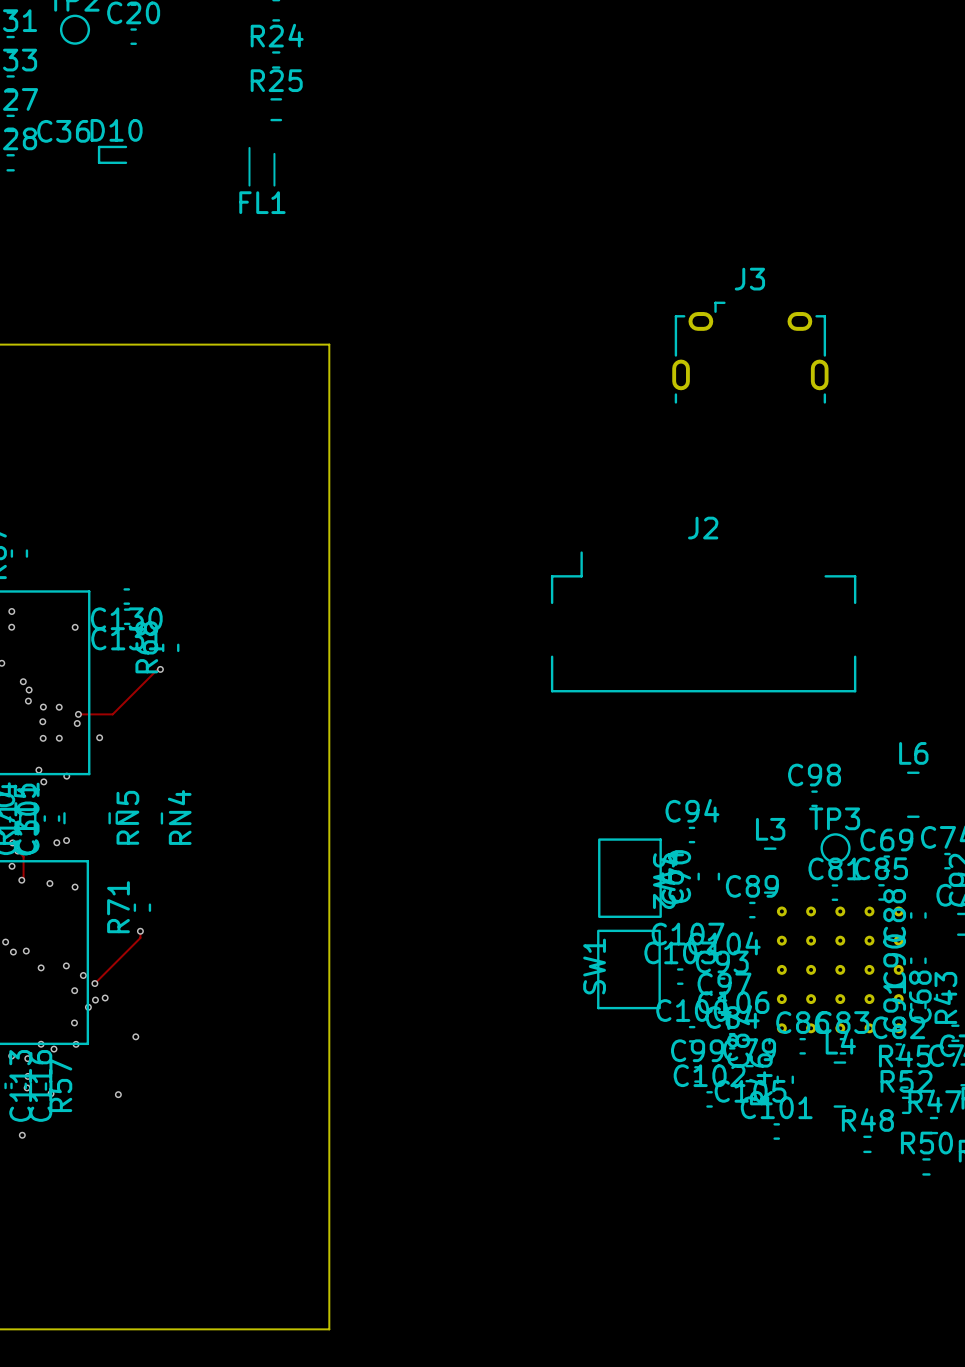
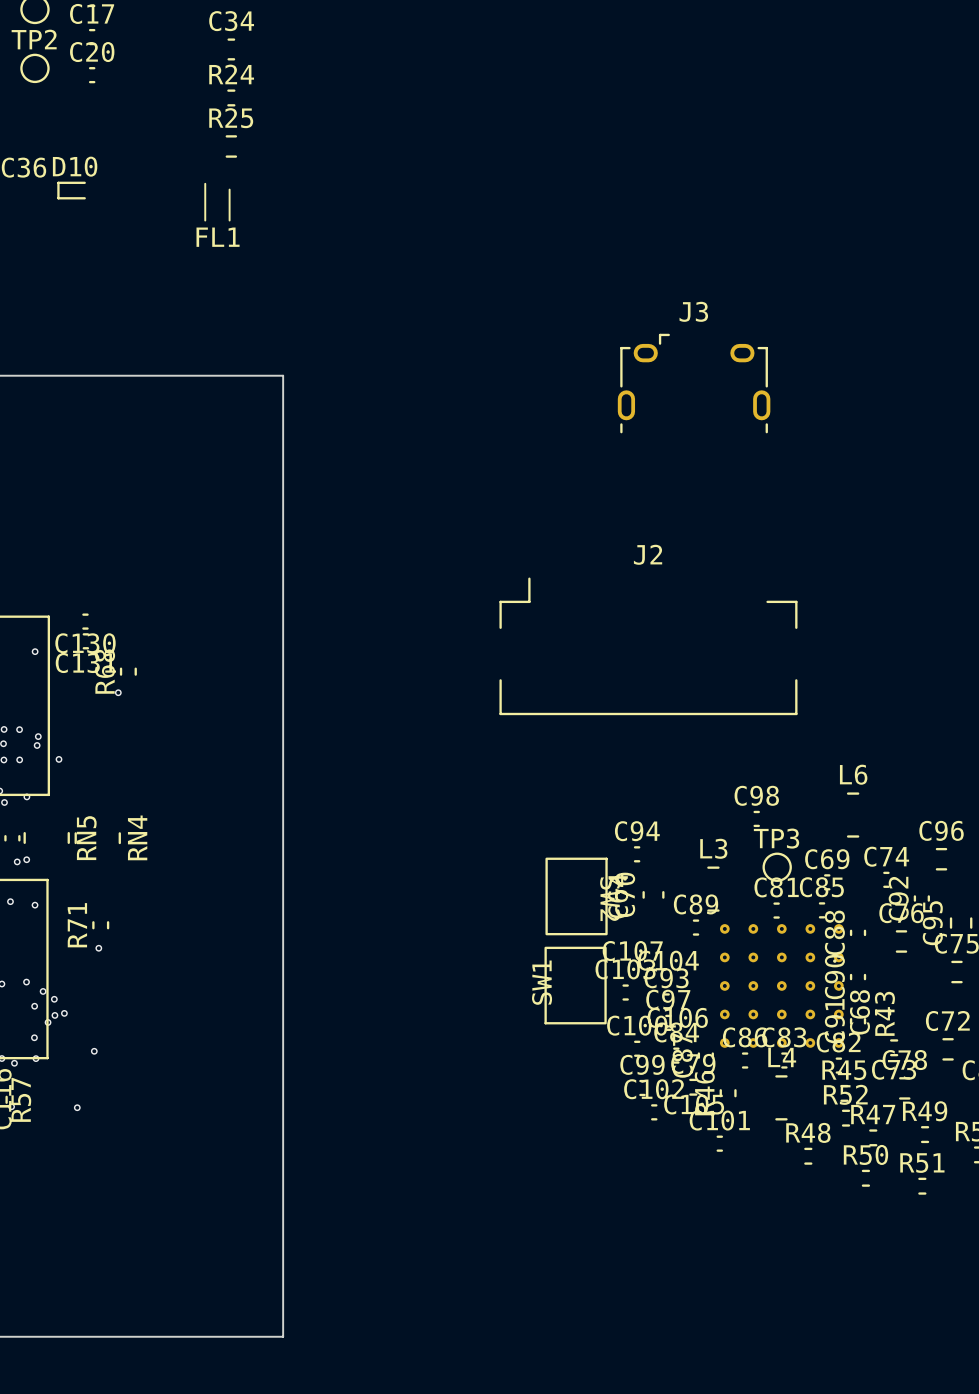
track: (160, 669) (157, 669) (112, 714) (78, 714) -> none
track: (140, 931) (140, 937) (94, 983) -> none

